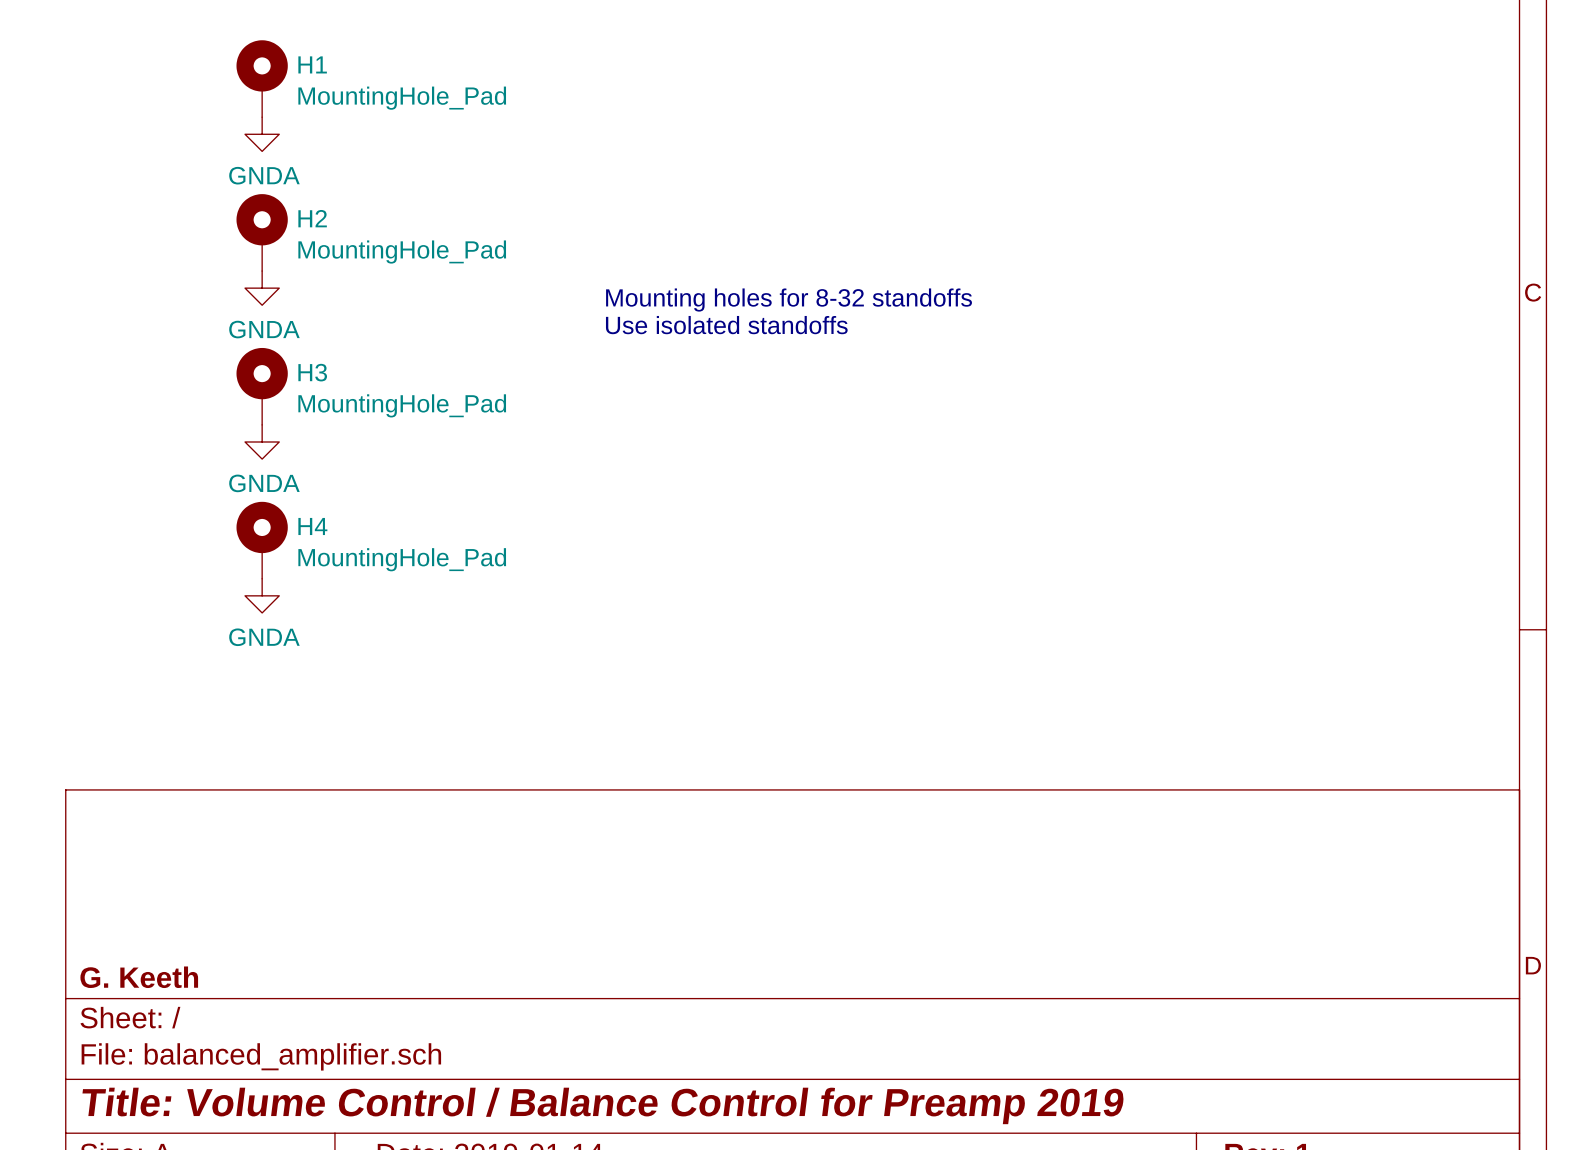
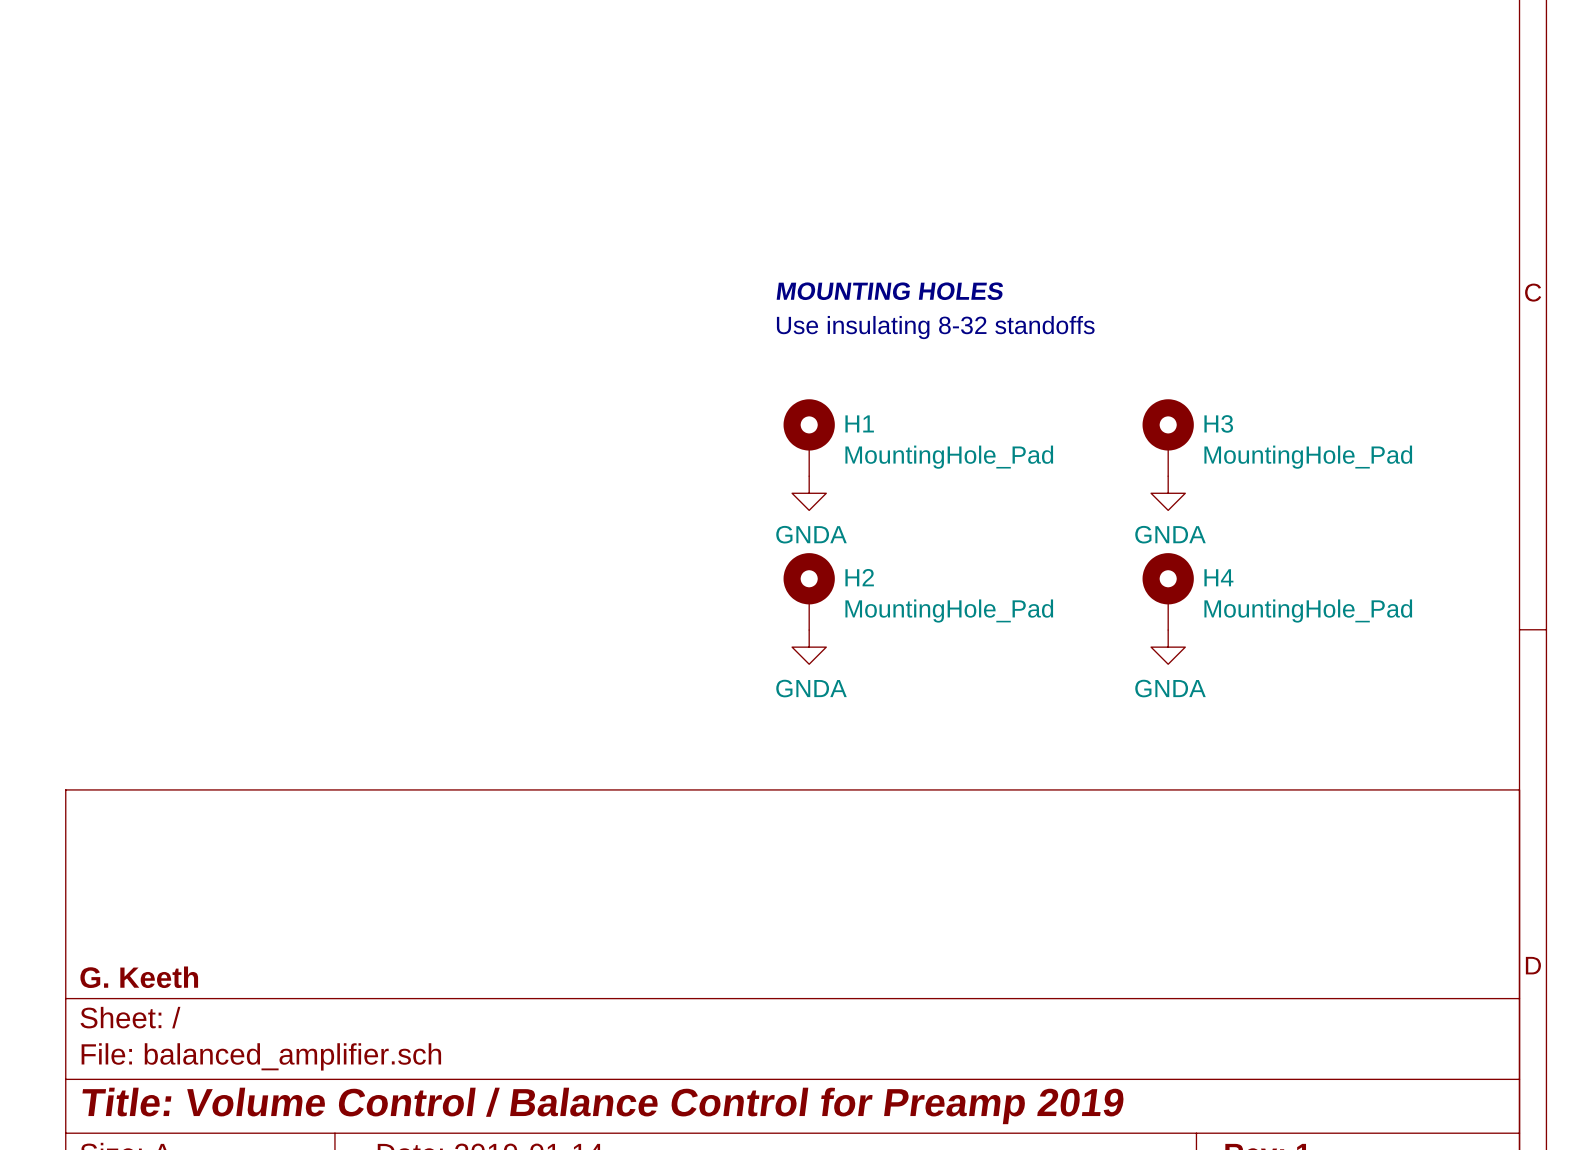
H1 position: (262, 78) -> (809, 437)
power symbol: GNDA (262, 134) -> none
H2 position: (262, 232) -> (809, 591)
power symbol: GNDA (262, 288) -> none
text: none -> MOUNTING HOLES (889, 291)
text: Mounting holes for 8-32 standoffs (789, 300) -> none
text: Use isolated standoffs (726, 325) -> none
text: none -> Use insulating 8-32 standoffs (935, 327)
H3 position: (262, 386) -> (1168, 437)
power symbol: GNDA (262, 441) -> none
power symbol: none -> GNDA (809, 493)
power symbol: none -> GNDA (1168, 493)
H4 position: (262, 540) -> (1168, 591)
power symbol: GNDA (262, 595) -> none
power symbol: none -> GNDA (809, 647)
power symbol: none -> GNDA (1168, 647)

